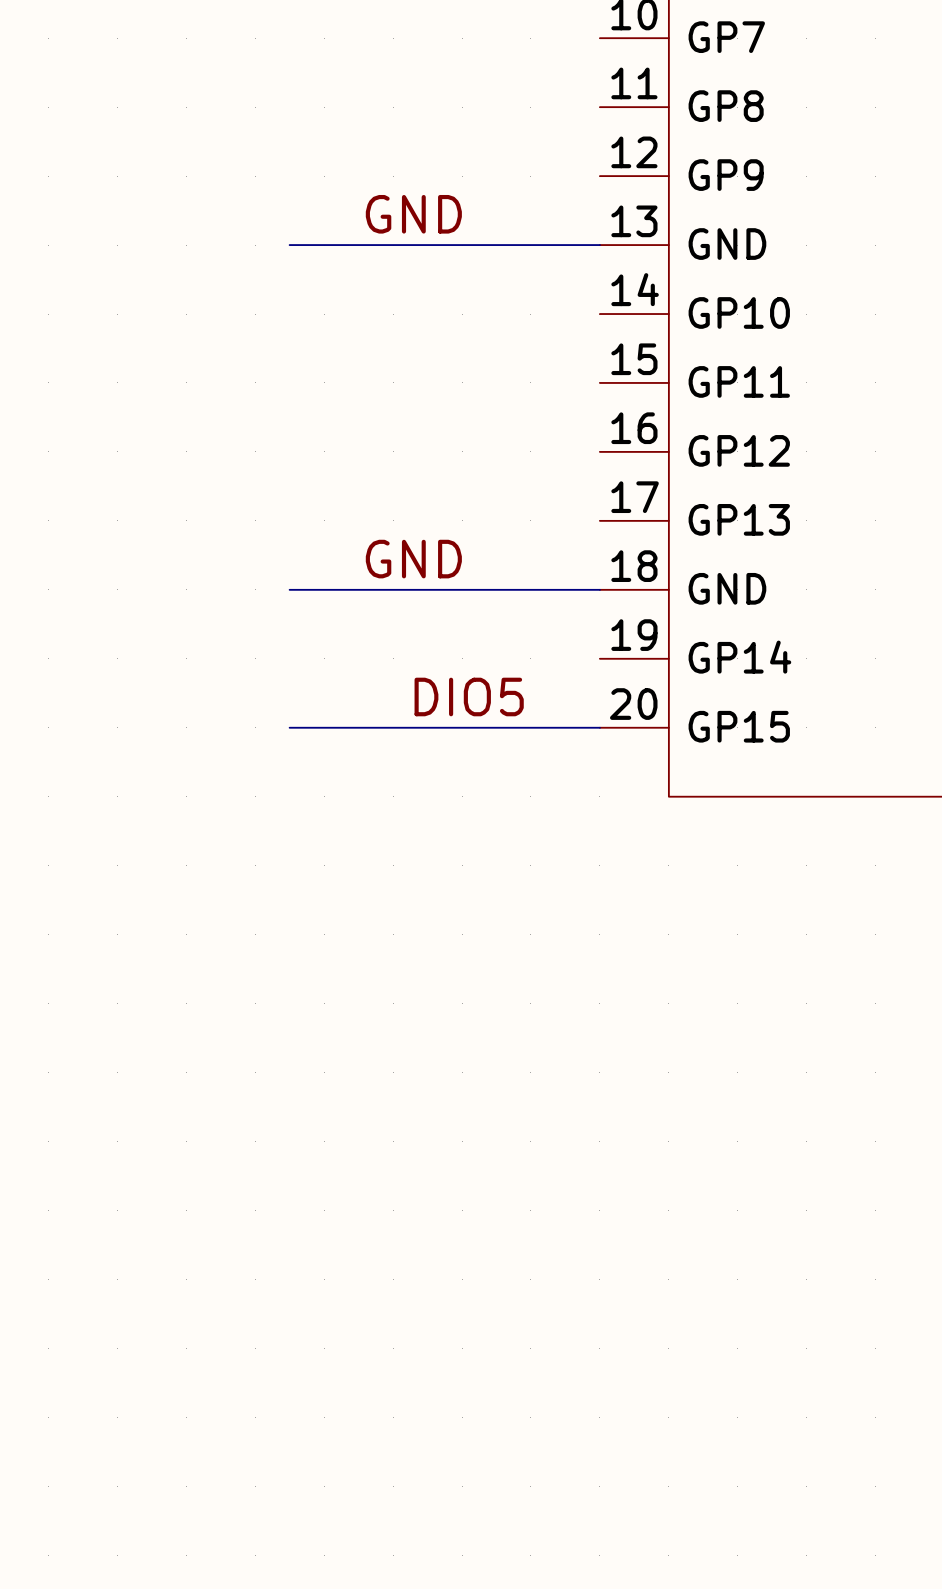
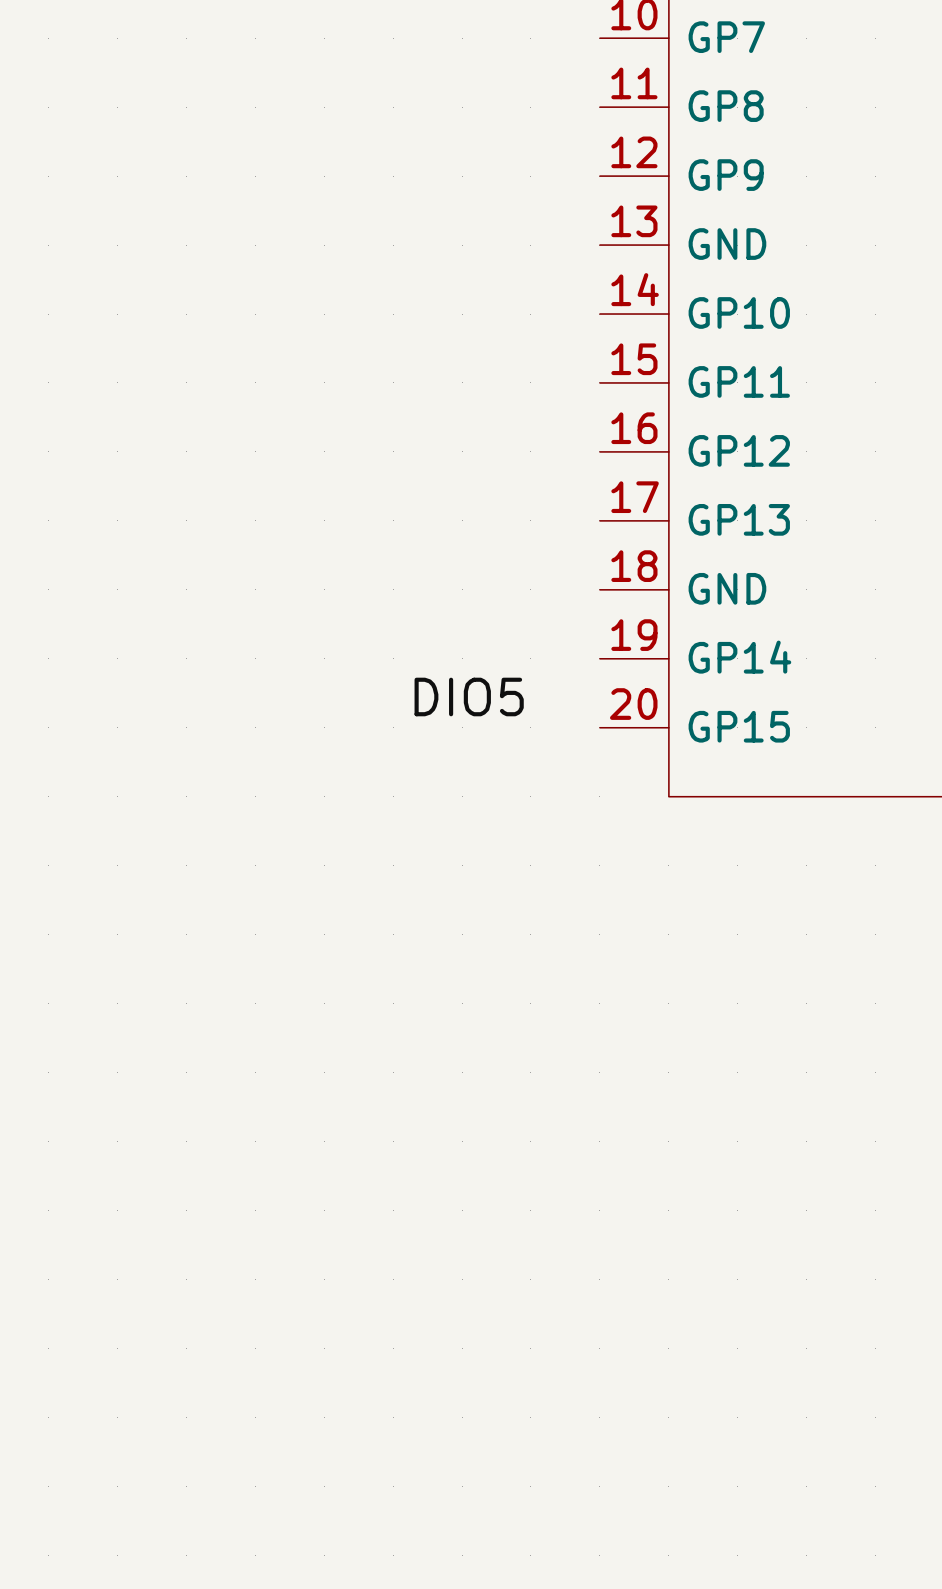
label: GND (413, 214) -> none
wire: (289, 245) (599, 245) -> none
label: GND (413, 559) -> none
wire: (289, 589) (599, 589) -> none
wire: (289, 727) (599, 727) -> none

